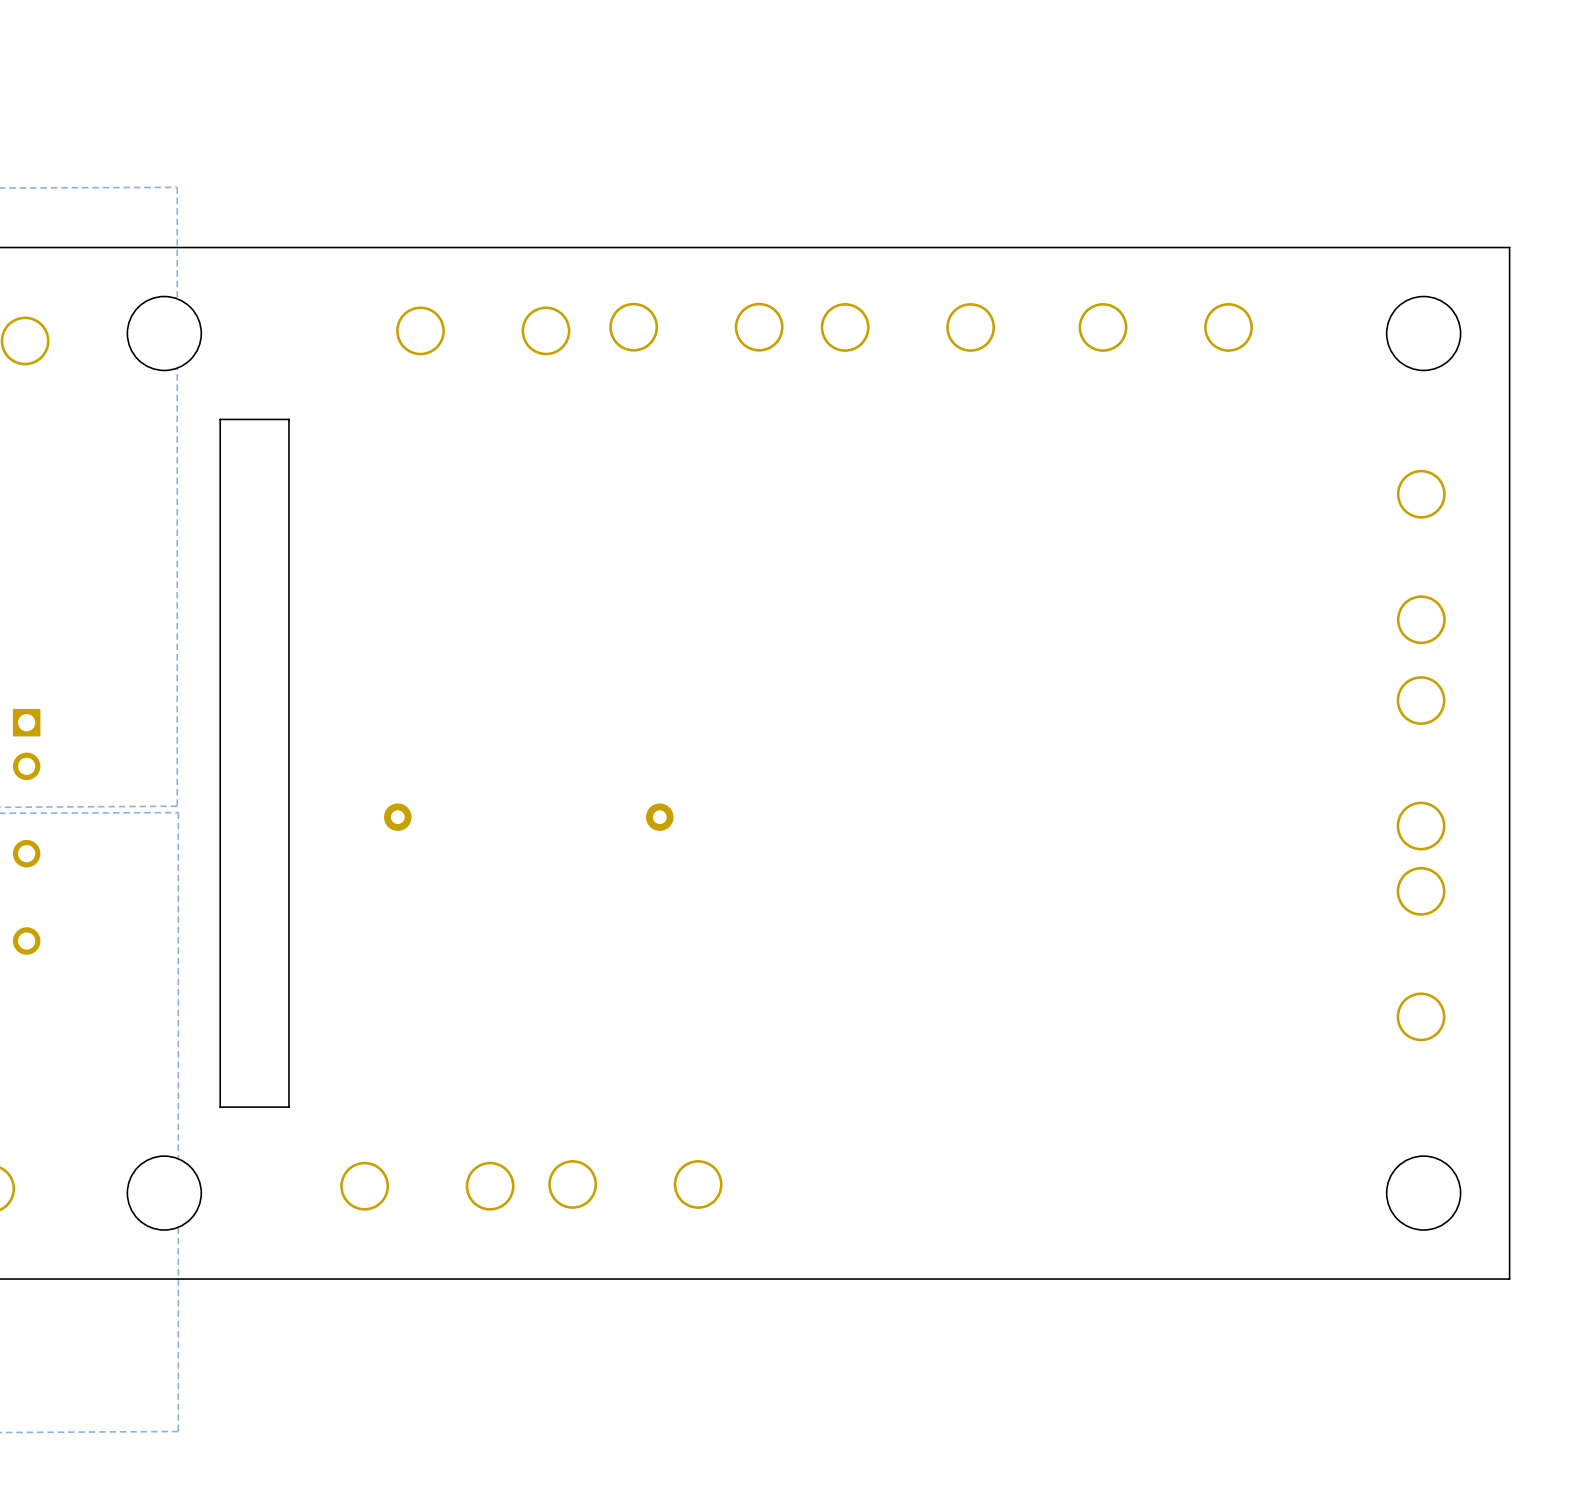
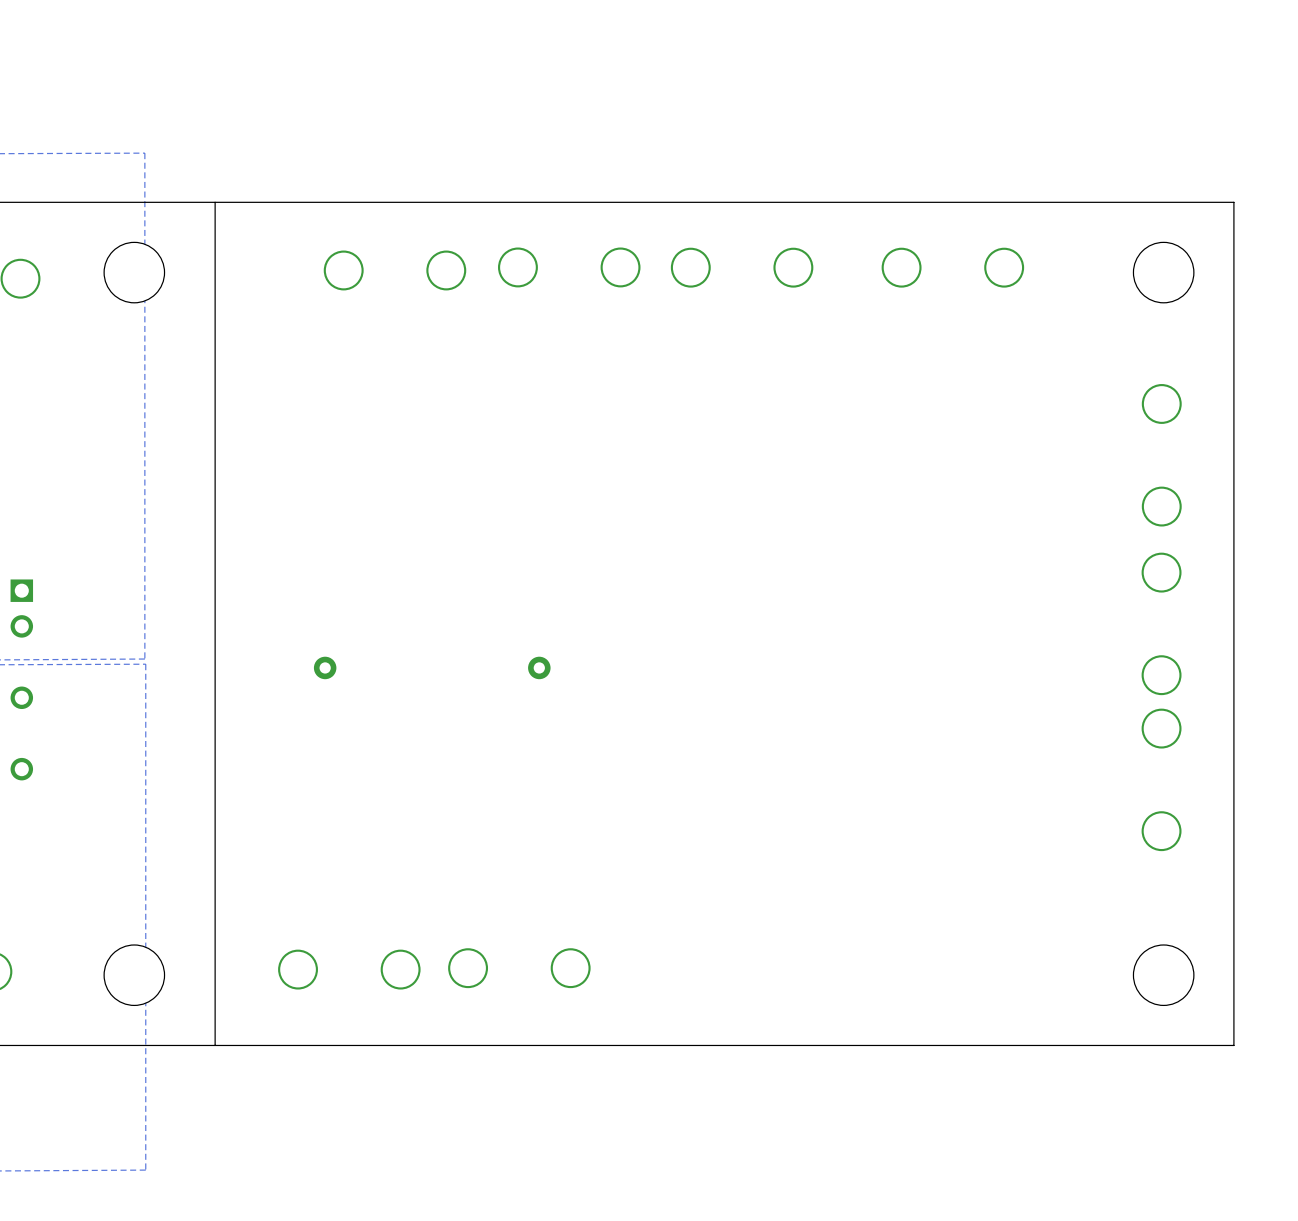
board edge: none -> (215, 202) (215, 1045)
board edge: (288, 419) (220, 419) (220, 1107) (288, 1107) (288, 419) -> none

